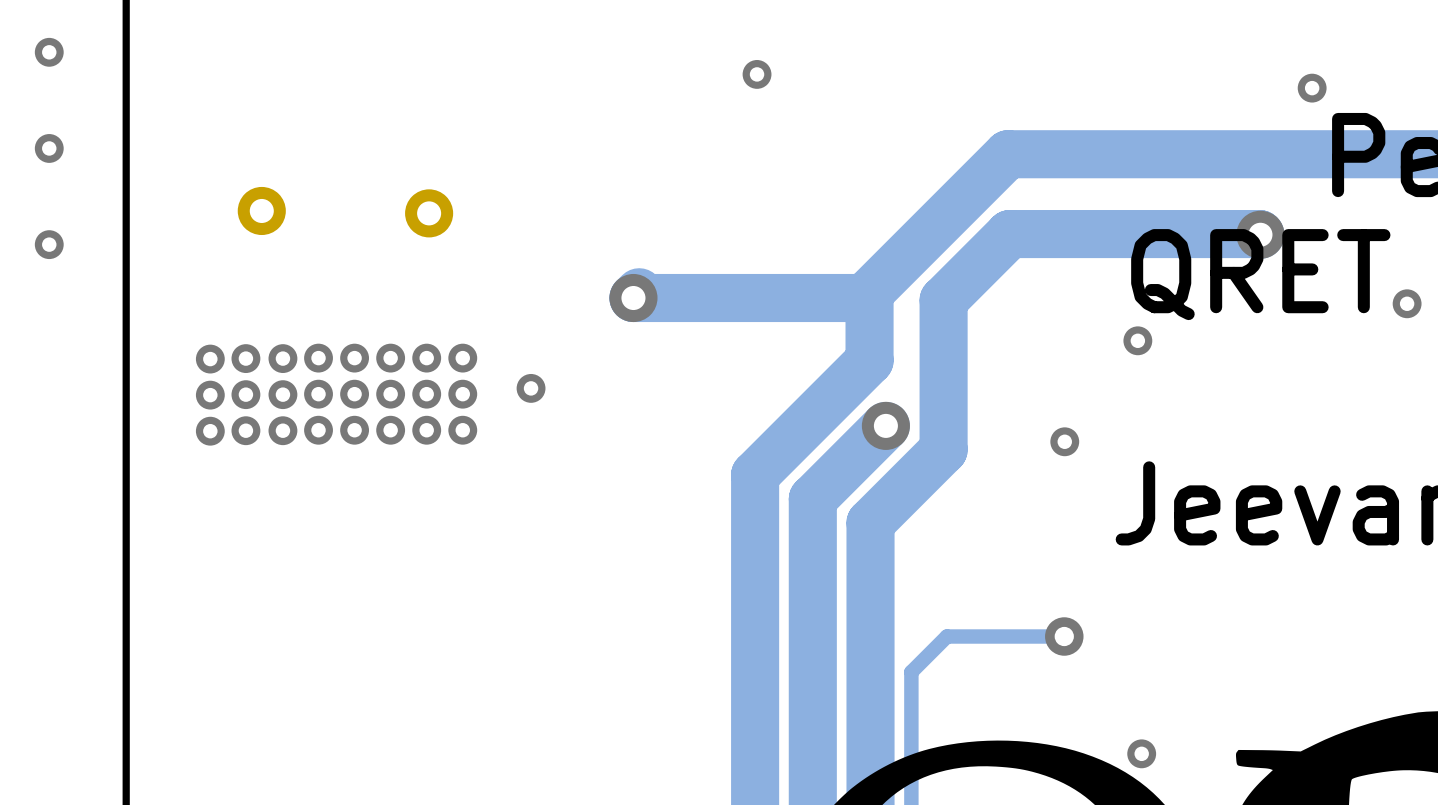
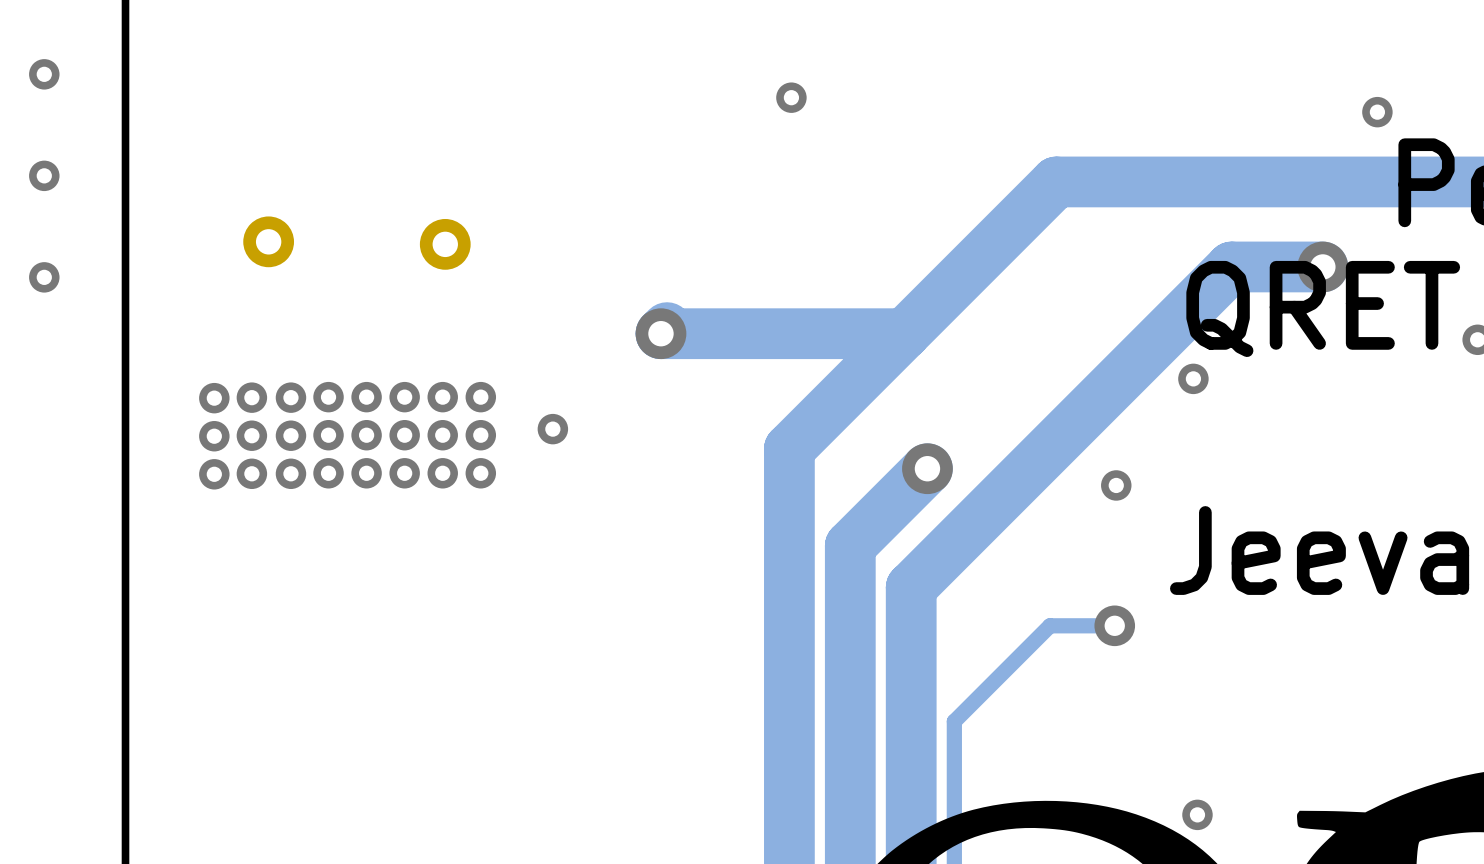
track: (1260, 234) (1009, 234) (943, 300) (943, 449) (870, 522) (870, 538) -> (1322, 266) (1231, 266) (911, 587)
track: (869, 292) (869, 360) (755, 474) -> (904, 333) (789, 448) (789, 520)
track: (1064, 636) (946, 636) (911, 672) -> (1114, 625) (1050, 625) (954, 721) (954, 728)
via position: (1064, 636) -> (1114, 625)

